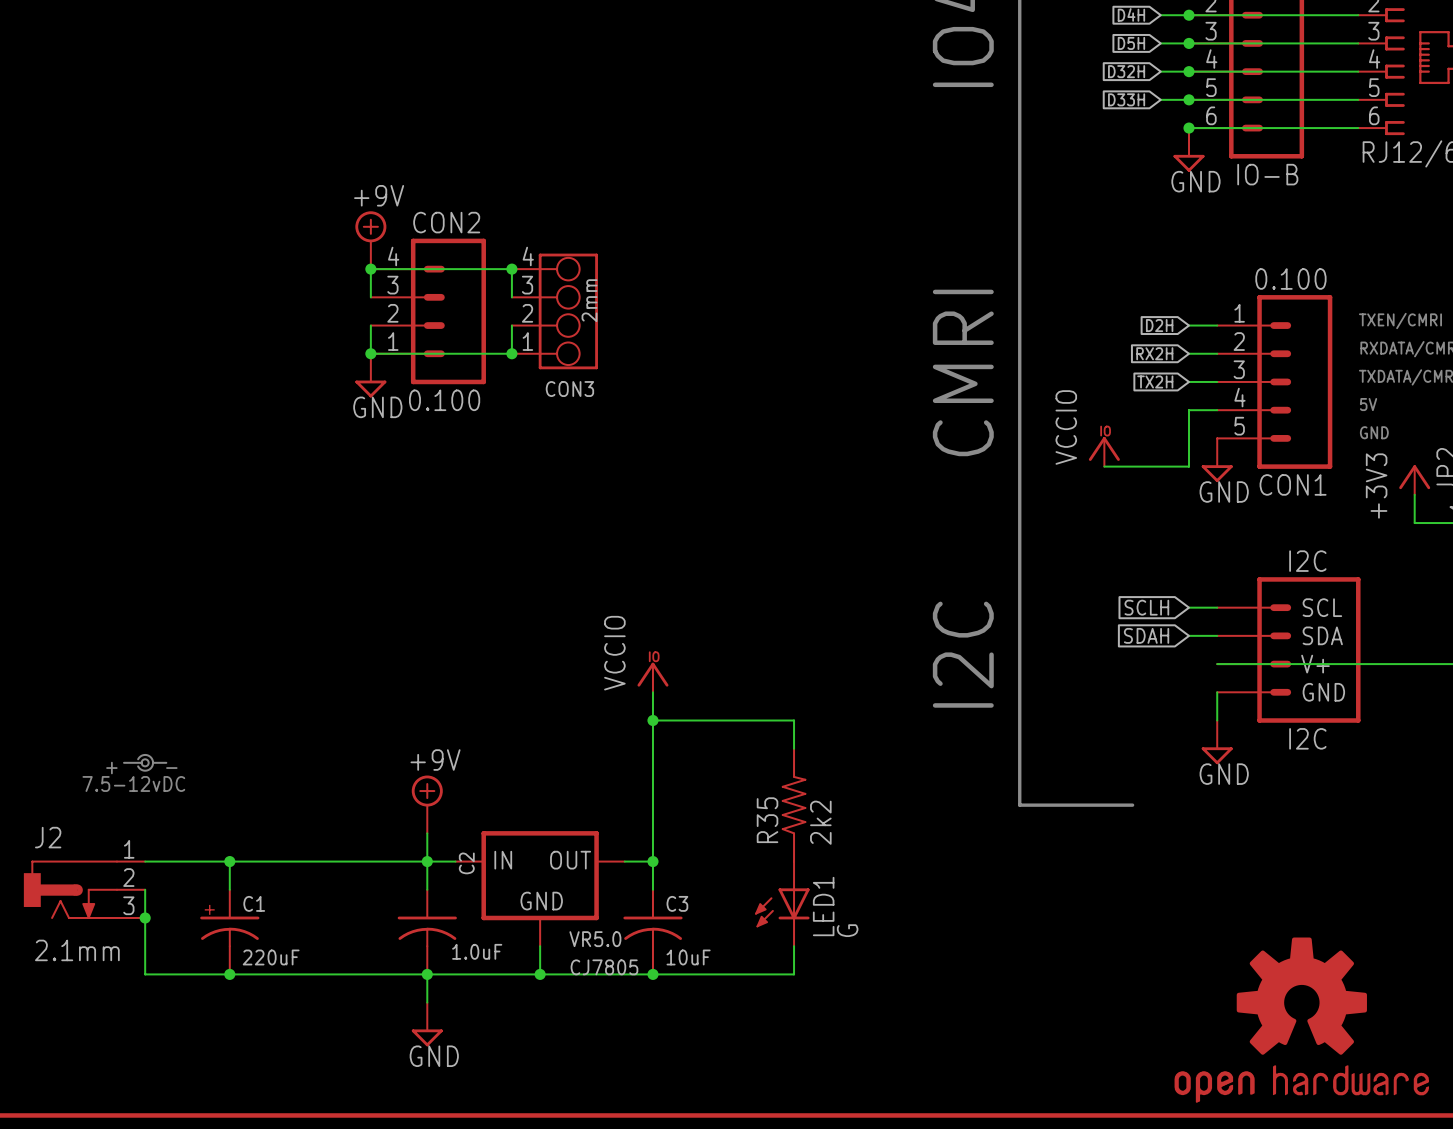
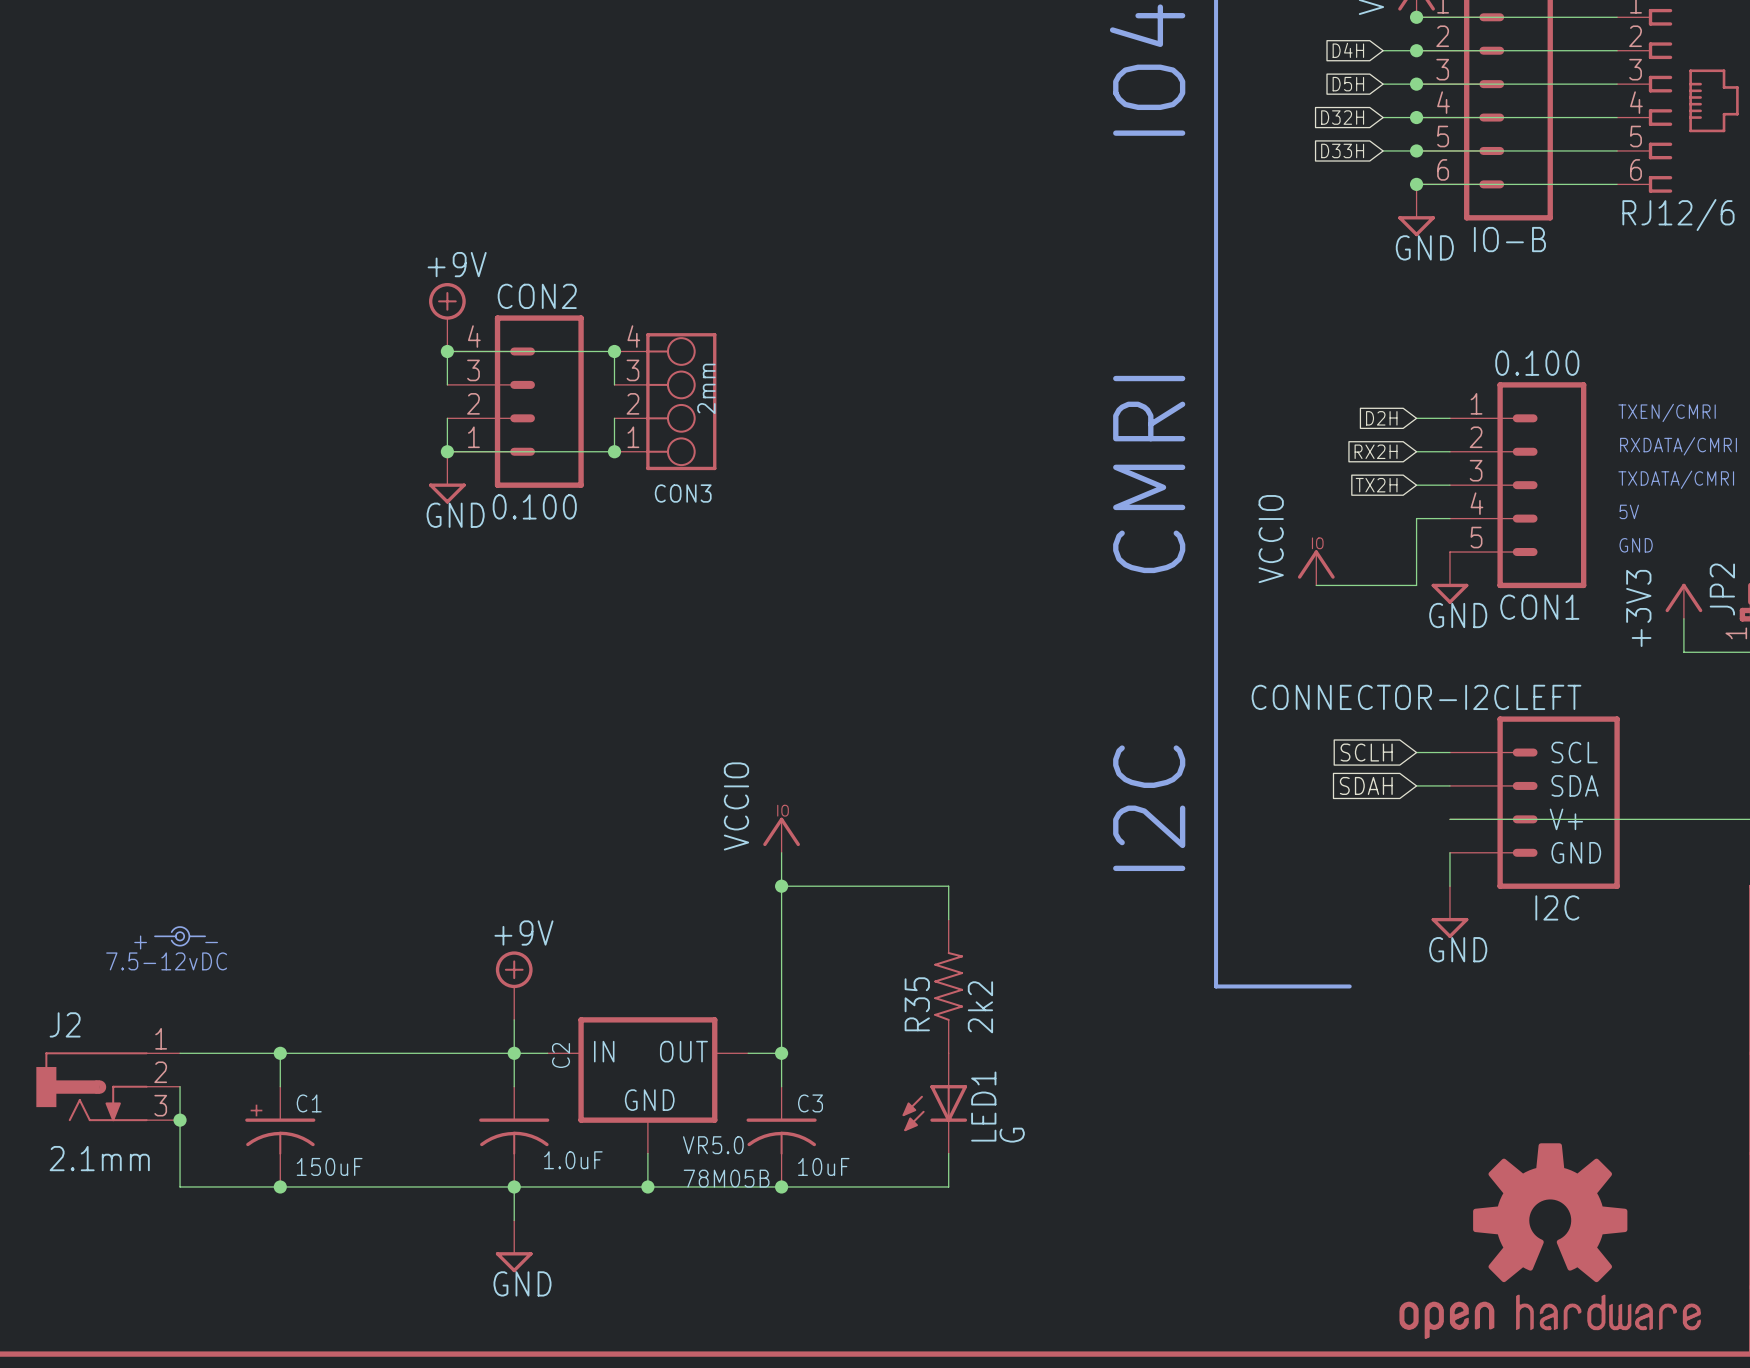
I2C value: I2C (1307, 561) -> CONNECTOR-I2CLEFT (1416, 697)
C1 value: 220uF (271, 957) -> 150uF (329, 1166)
VR5.0 value: CJ7805 (604, 967) -> 78M05B (726, 1178)

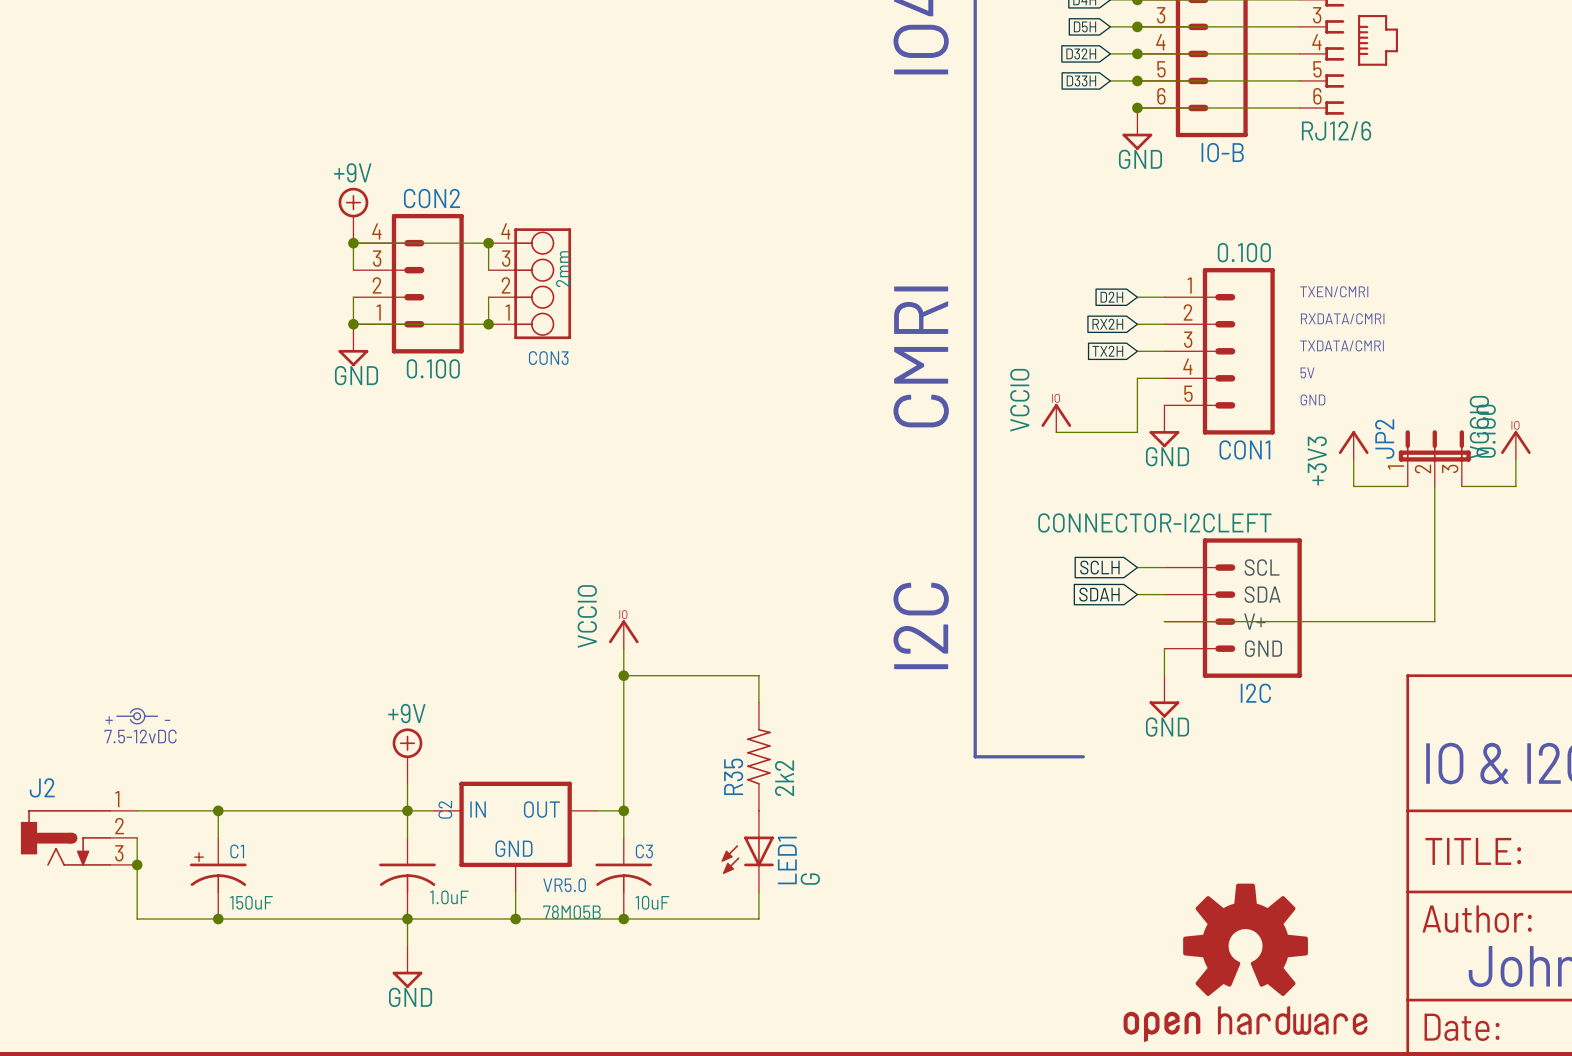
J2 value: 2.1mm (99, 1158) -> none

